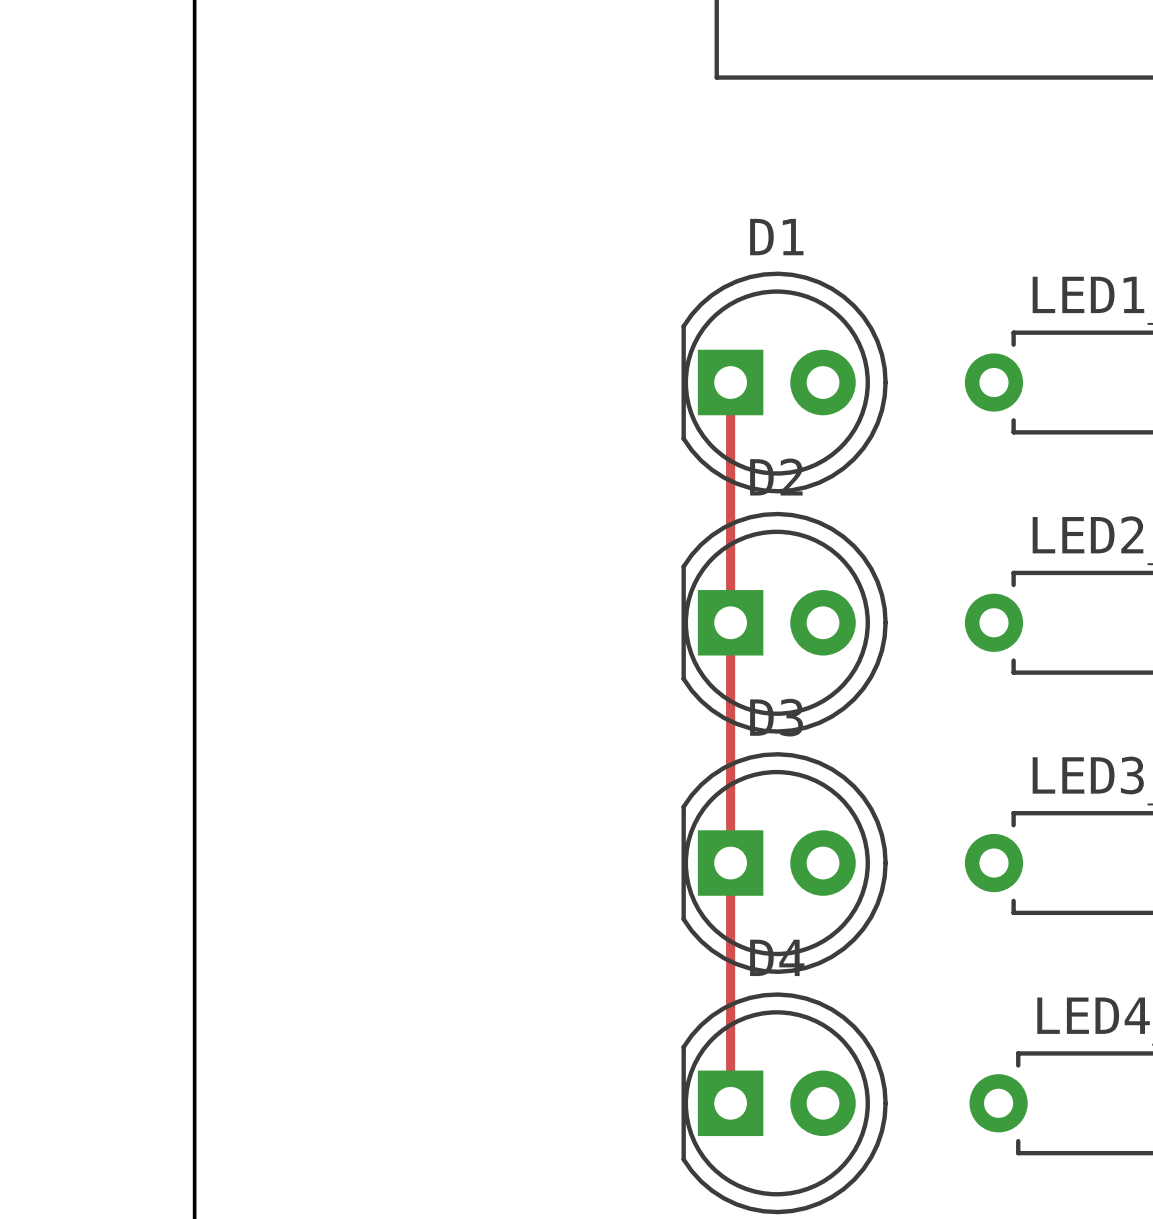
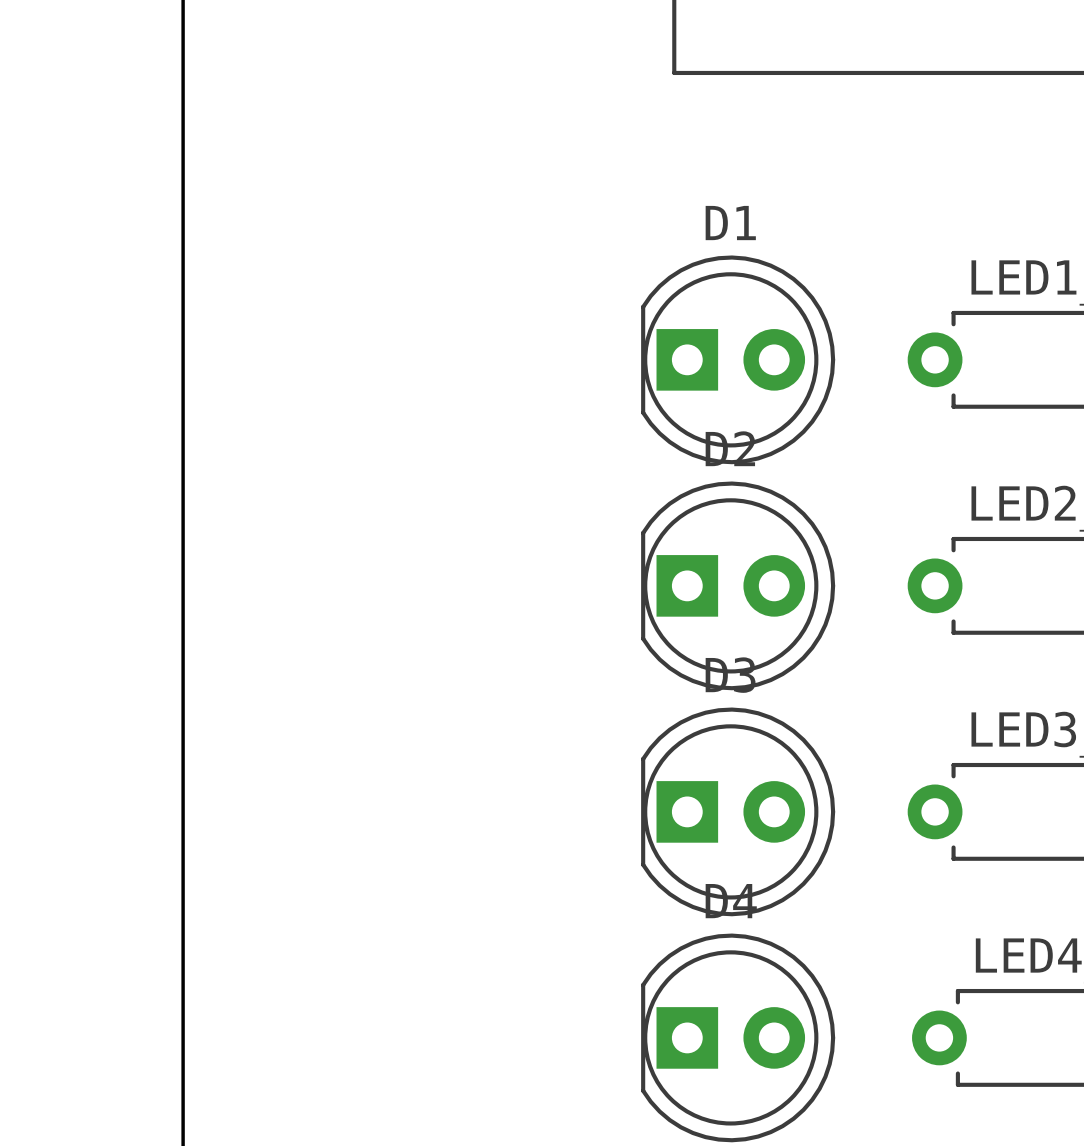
track: (730, 382) (730, 1103) -> none

